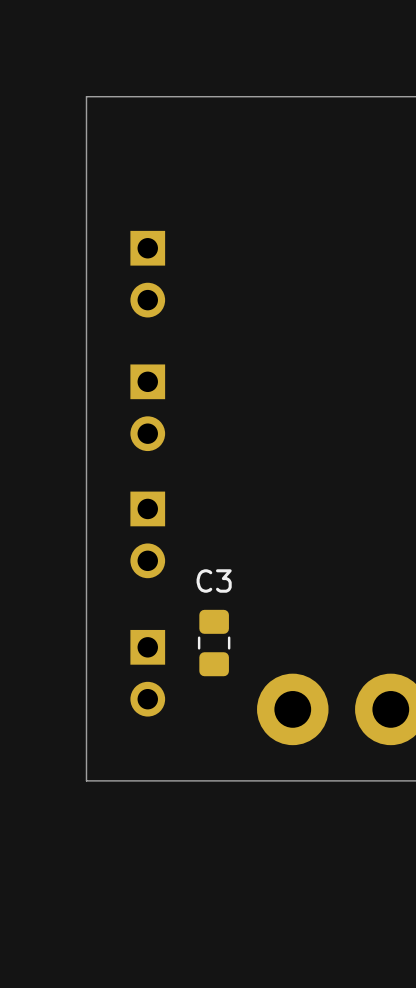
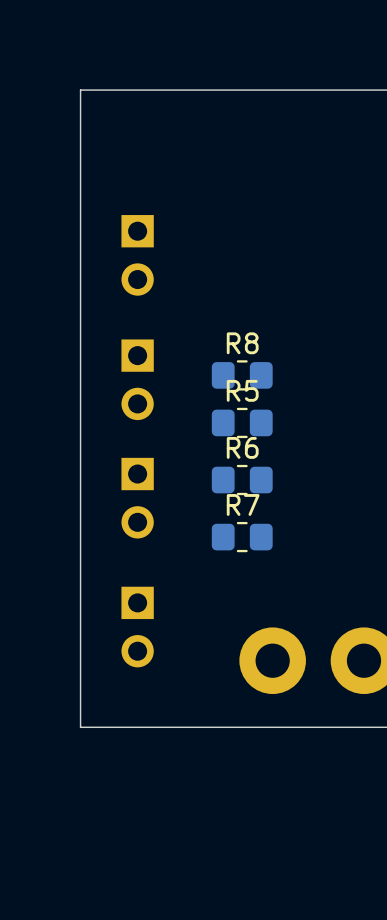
R8: none -> (242, 375)
R5: none -> (242, 422)
R6: none -> (242, 480)
R7: none -> (242, 537)
C3: (214, 643) -> none

